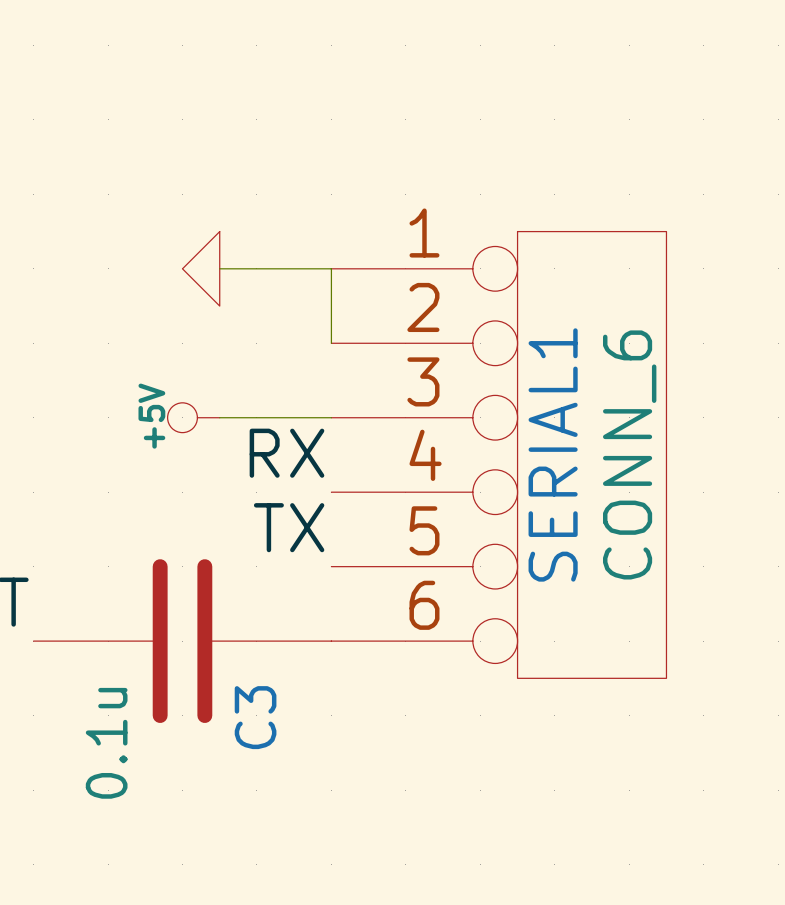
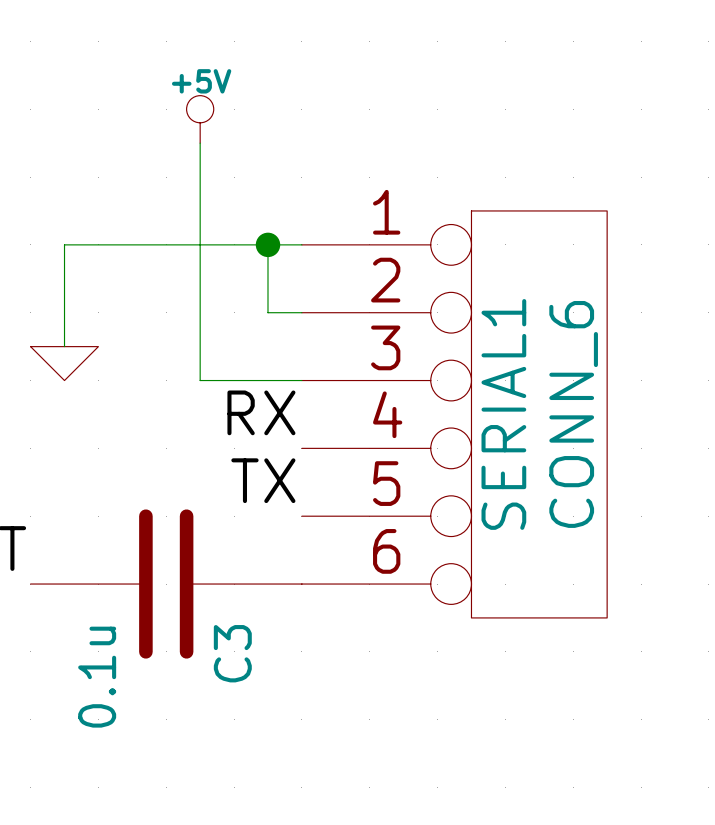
wire: none -> (200, 143) (200, 380)
power symbol rotation: 0° (201, 268) -> 90° counterclockwise (64, 363)
power symbol position: (201, 268) -> (64, 363)
wire: none -> (200, 244) (64, 244) (64, 346)
junction: none -> (267, 244)
wire: (331, 268) (331, 343) -> (267, 244) (267, 312) (301, 312)
power symbol rotation: 0° (193, 417) -> 90° clockwise (200, 119)
power symbol position: +5V (193, 417) -> +5V (200, 119)

